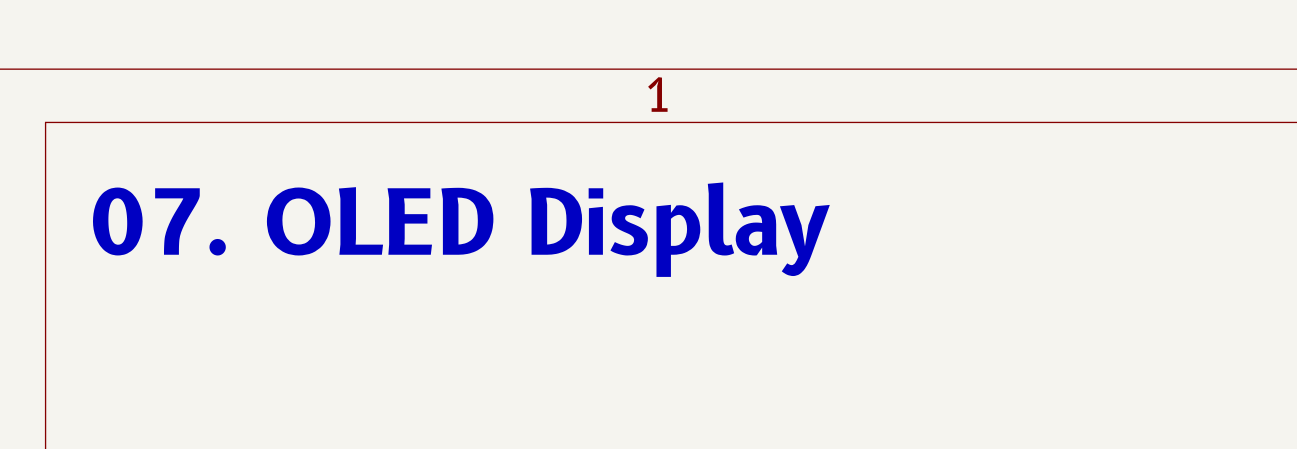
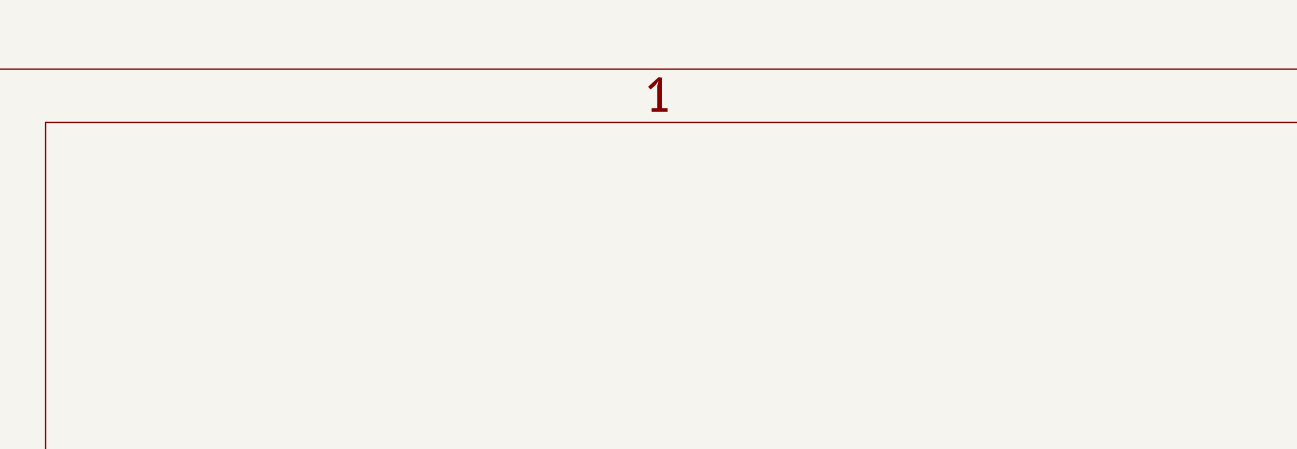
text: 07. OLED Display (461, 229) -> none

